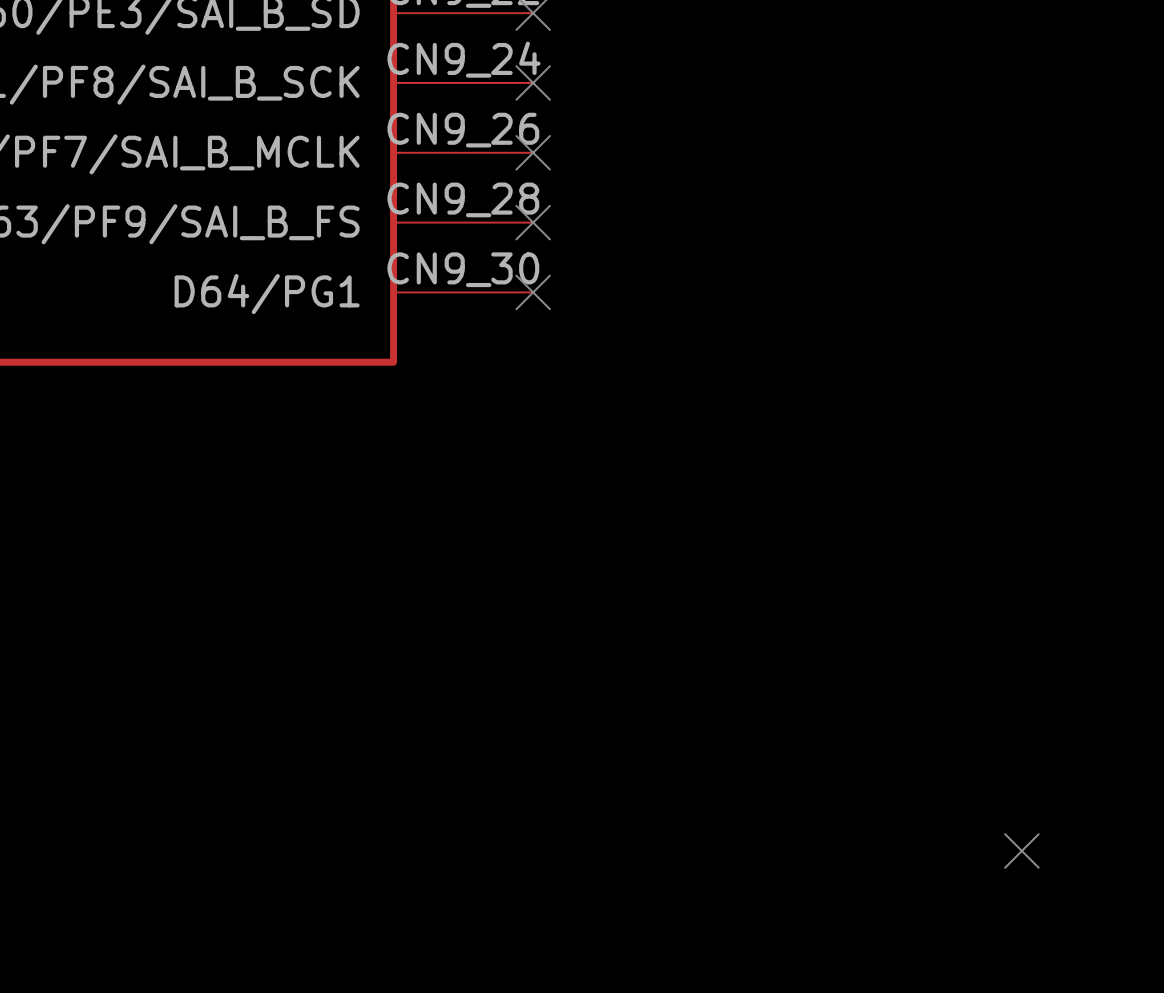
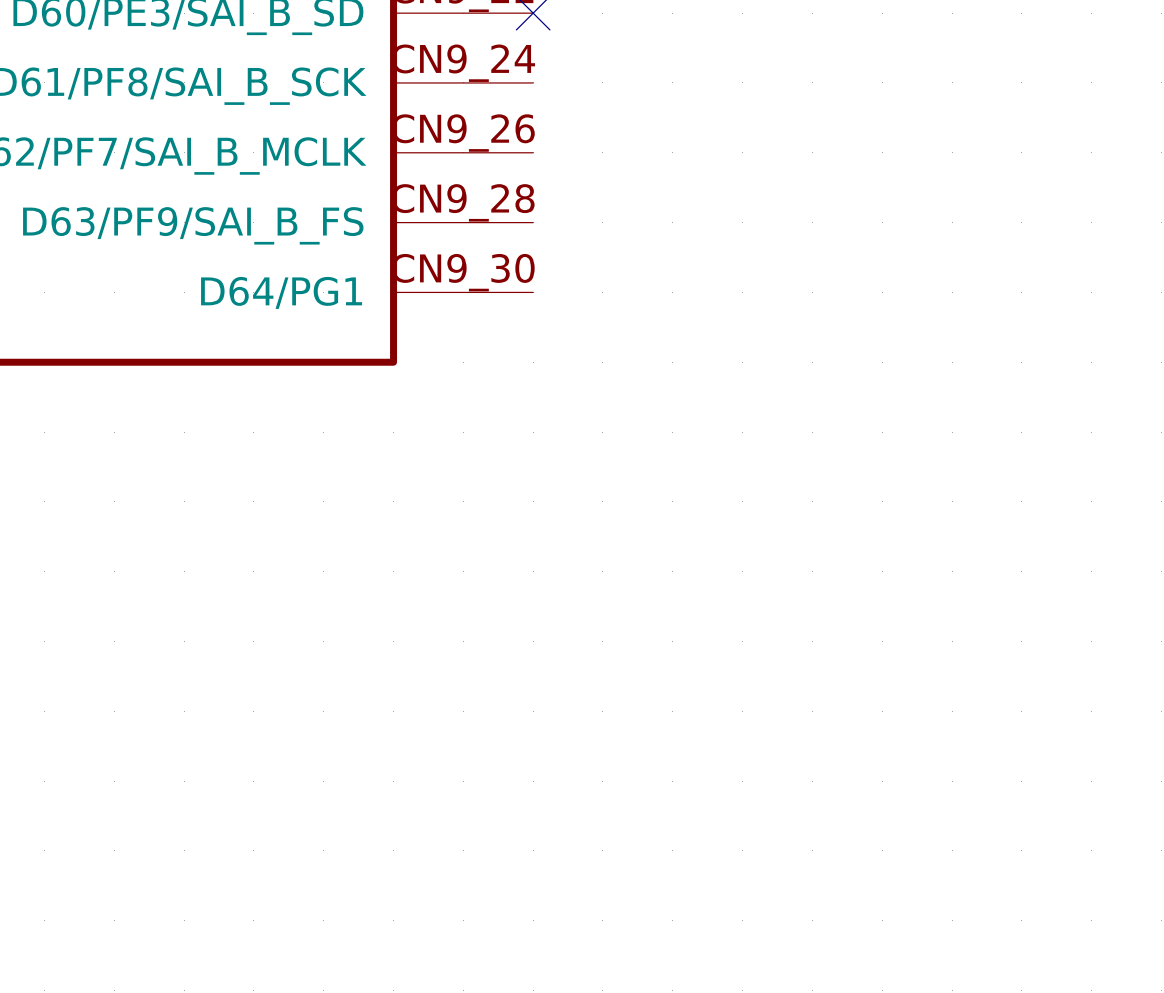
no-connect mark: (533, 82) -> none
no-connect mark: (533, 152) -> none
no-connect mark: (533, 222) -> none
no-connect mark: (533, 292) -> none
no-connect mark: (1021, 850) -> none

